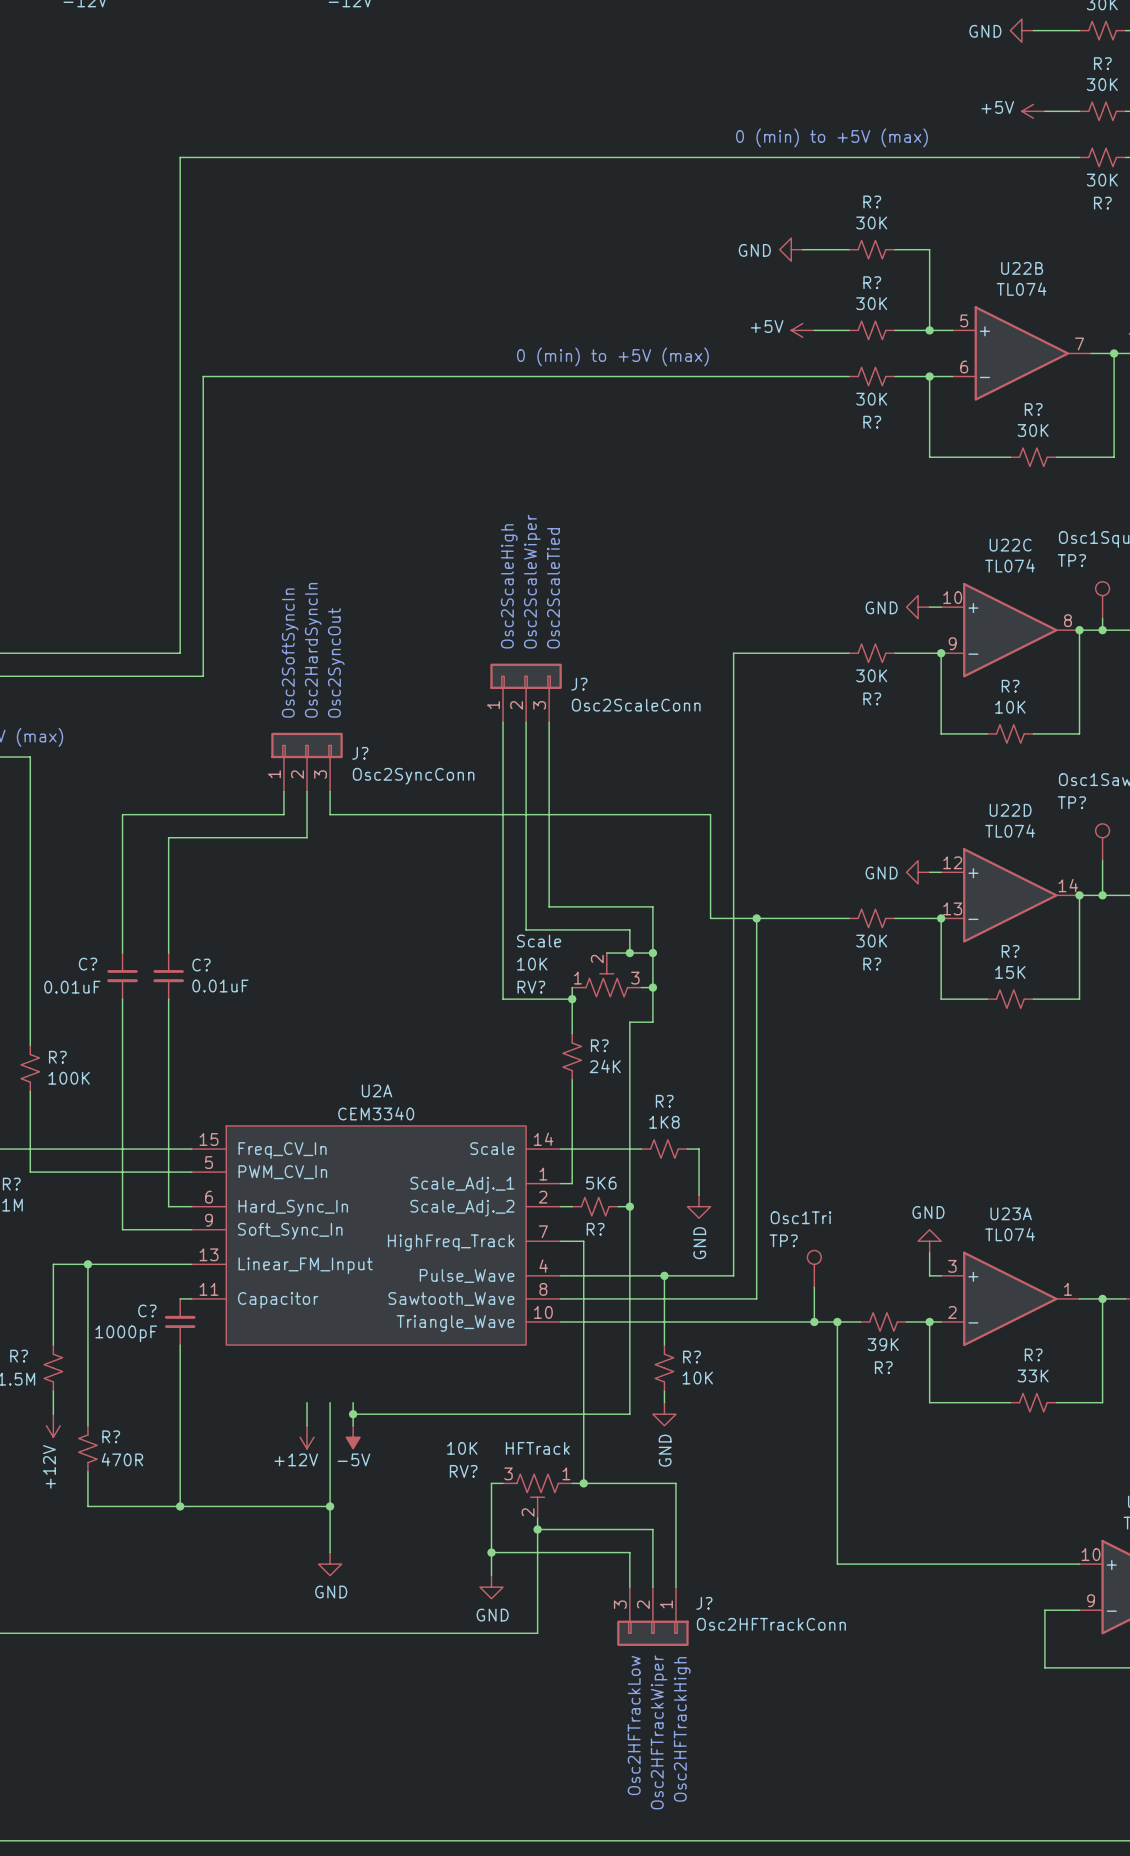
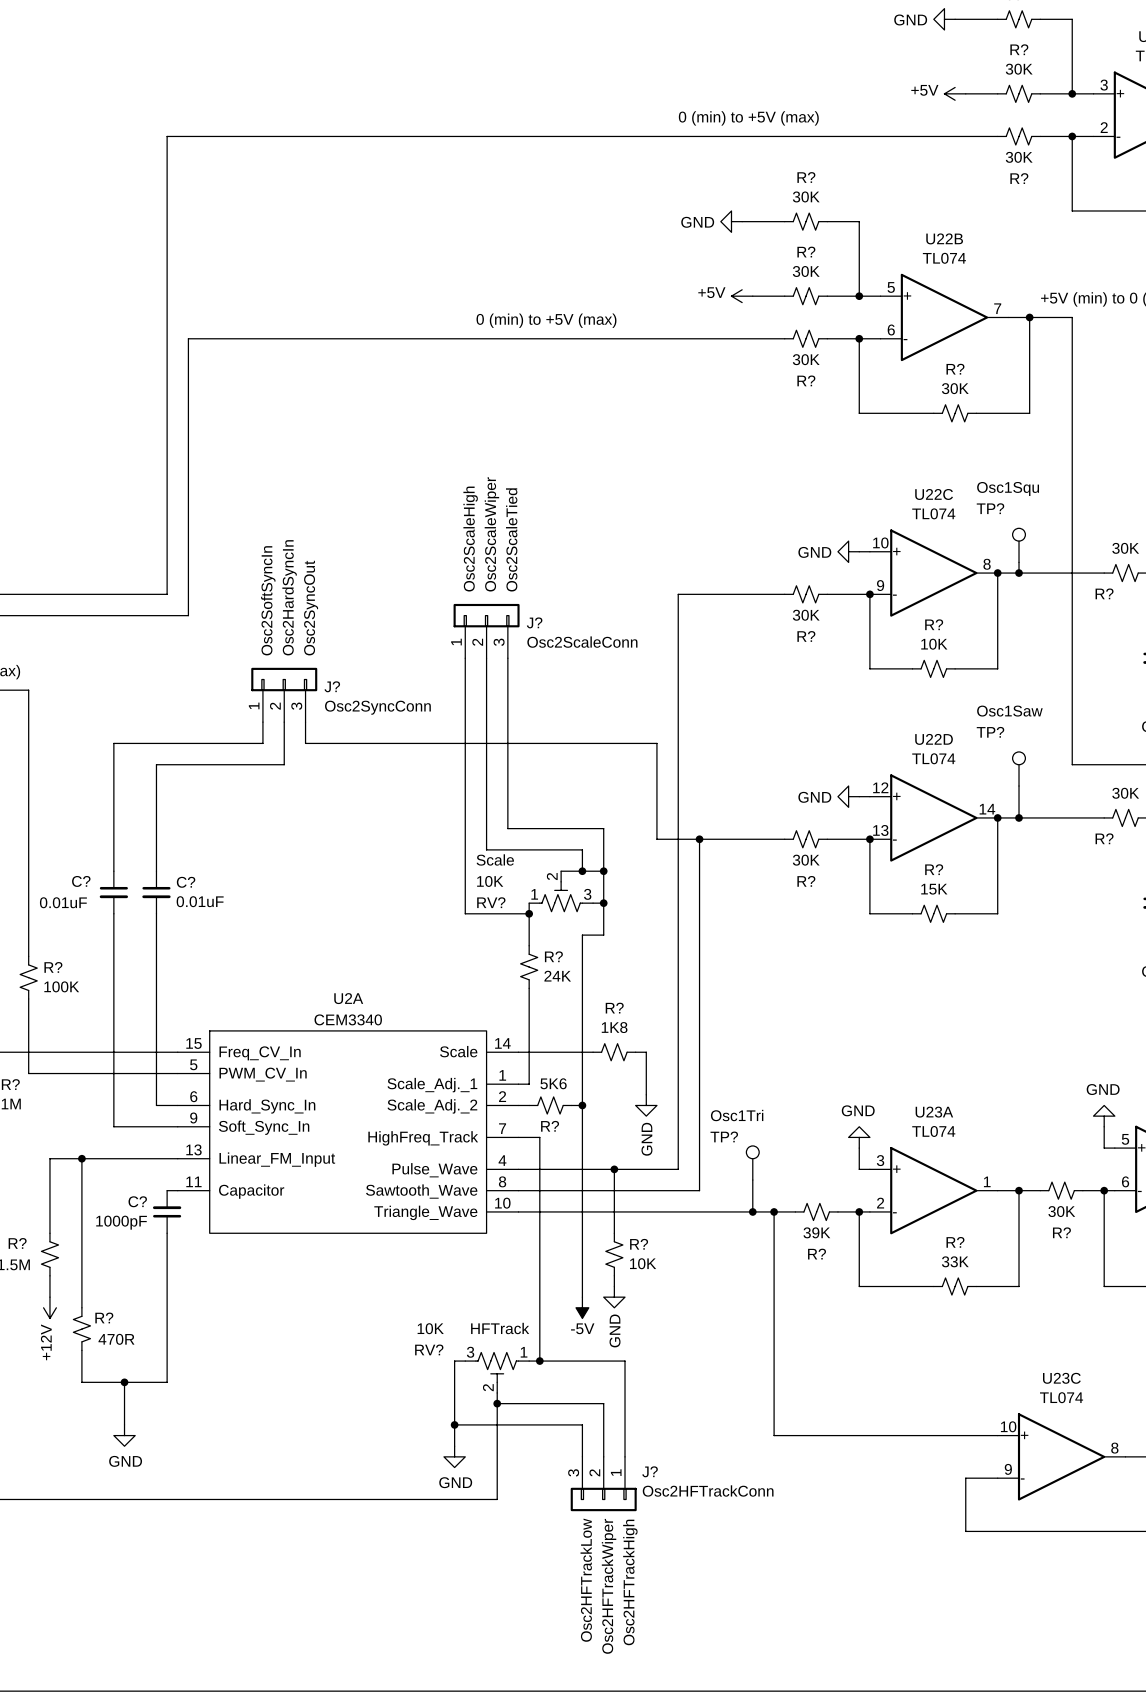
wire: (307, 1402) (307, 1425) -> none
wire: (330, 1402) (330, 1552) -> none
wire: (353, 1402) (353, 1425) -> none
wire: (353, 1414) (629, 1414) -> none
junction: (353, 1414) -> none
power symbol: none -> -5V (582, 1307)
power symbol: +12V (307, 1437) -> none
power symbol: -5V (353, 1437) -> none
wire: none -> (124, 1382) (124, 1424)
wire: (180, 1506) (330, 1506) -> none
junction position: (180, 1506) -> (124, 1382)
junction: (330, 1506) -> none
power symbol position: GND (330, 1564) -> GND (124, 1435)

